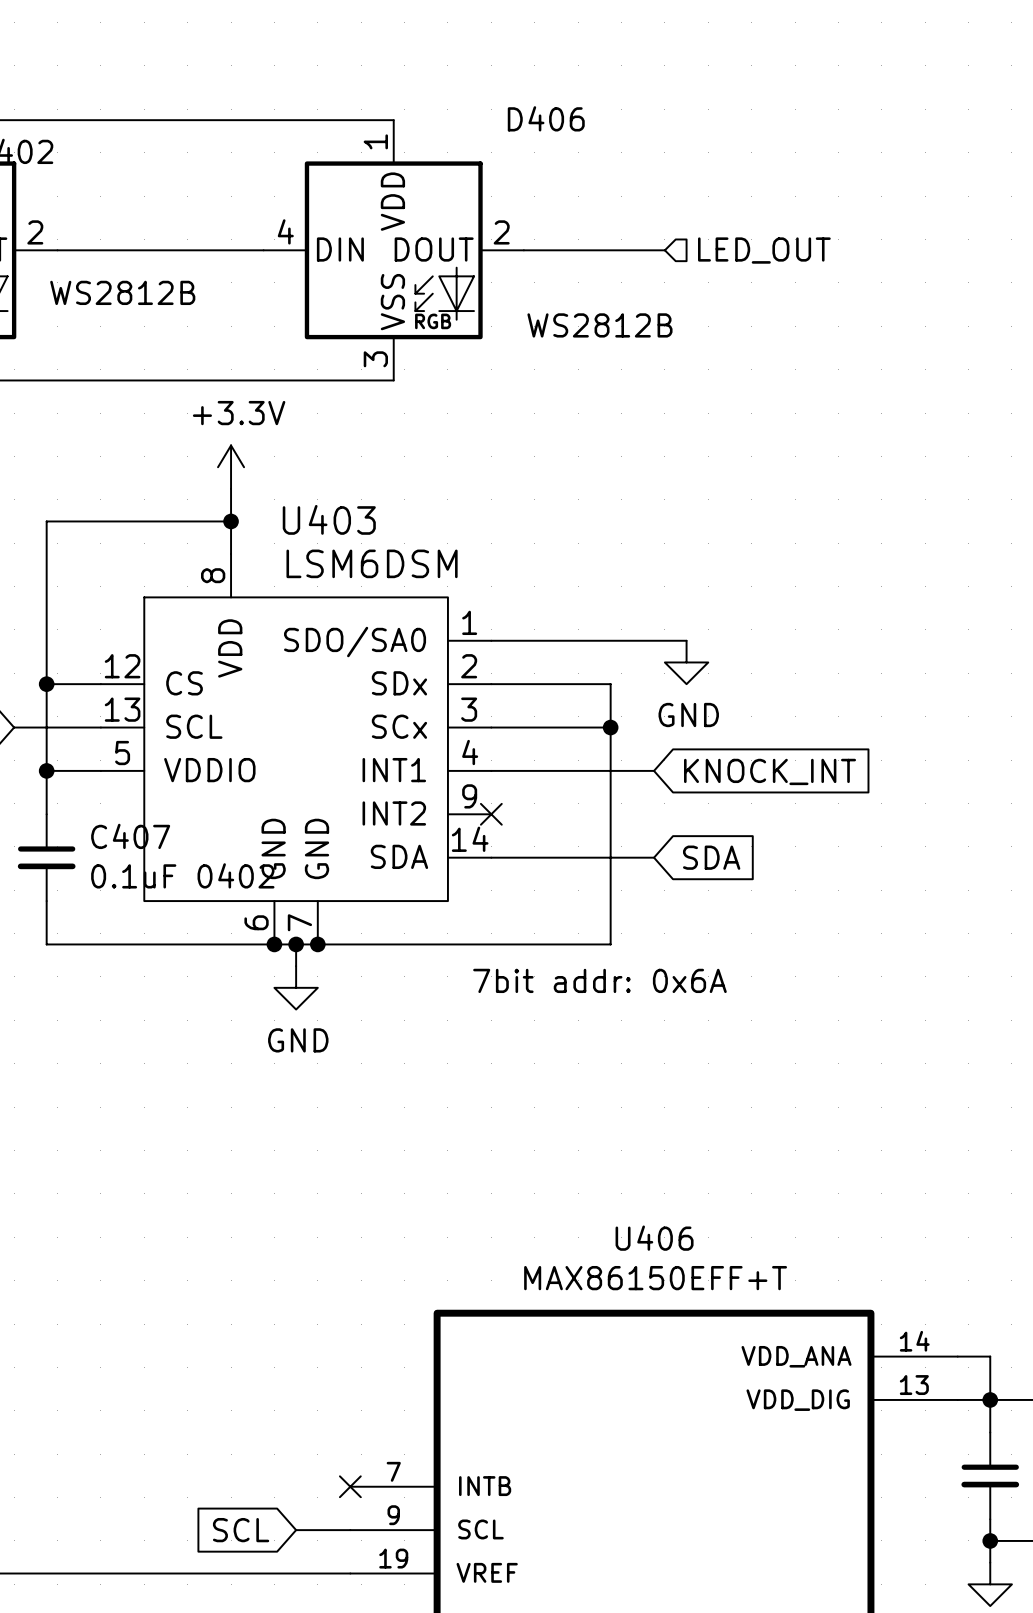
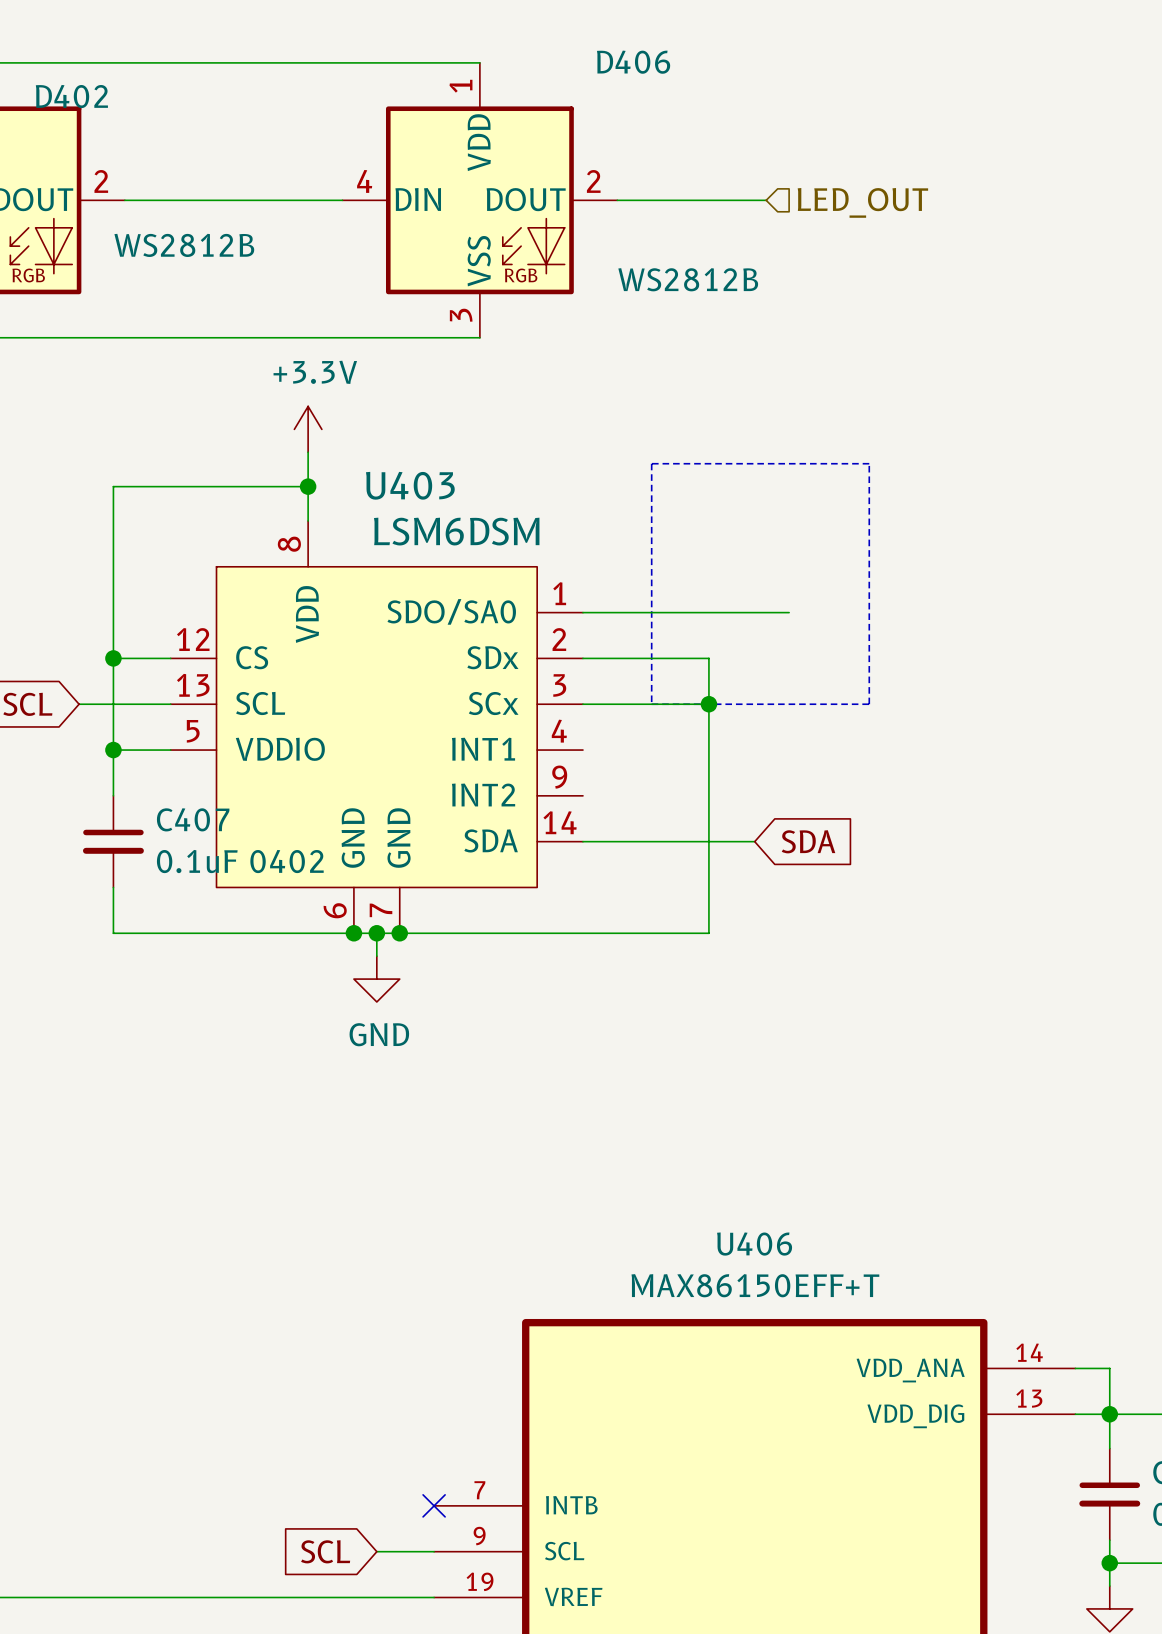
line: none -> (651, 463) (651, 704) (869, 704) (869, 463) (651, 463)
power symbol: GND (686, 662) -> none
wire: (491, 770) (654, 770) -> none
global label: KNOCK_INT (770, 771) -> none
no-connect mark: (491, 814) -> none
text: 7bit addr: 0x6A (599, 980) -> none

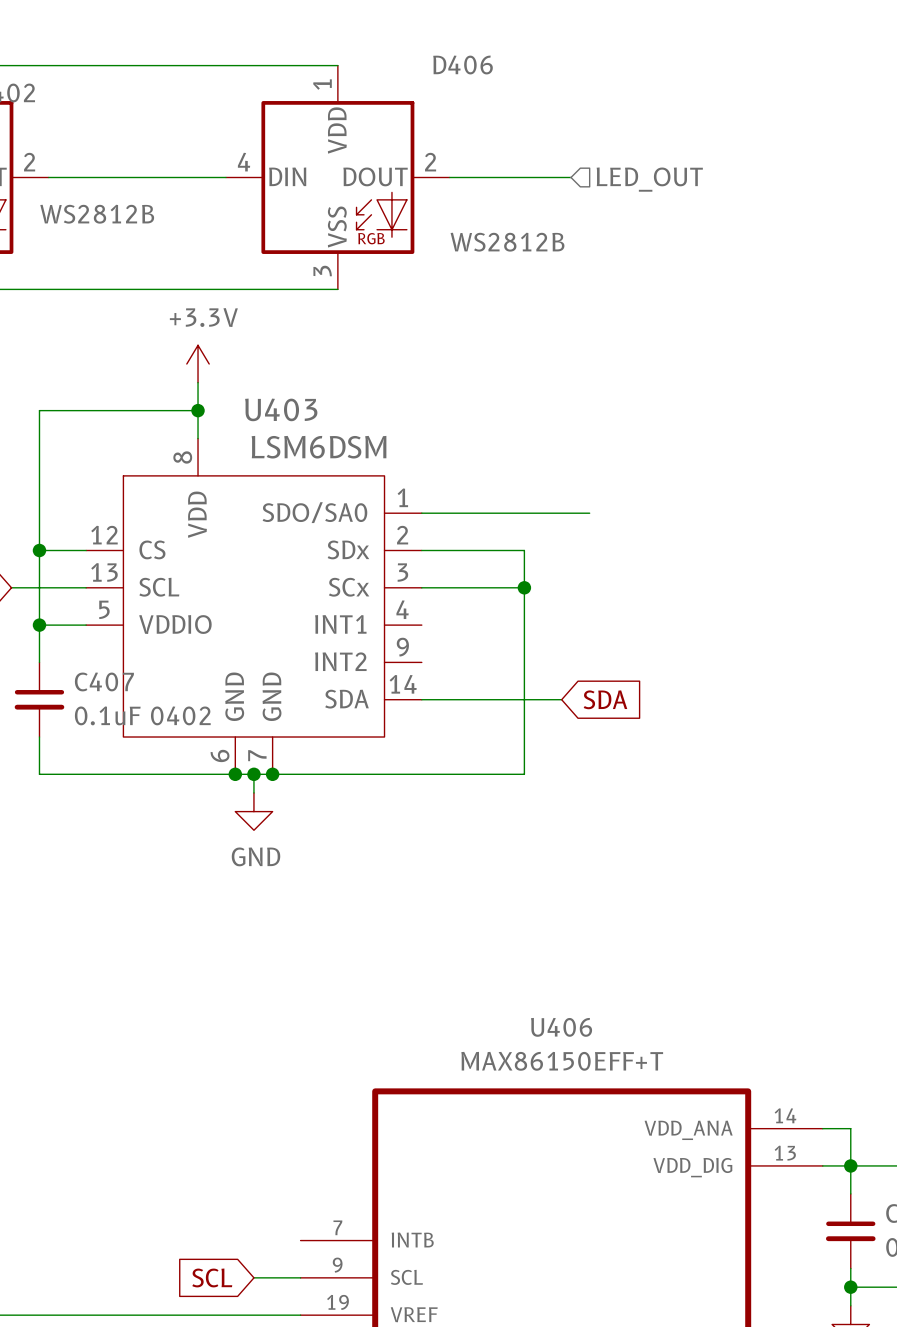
line: (651, 463) (651, 704) (869, 704) (869, 463) (651, 463) -> none
no-connect mark: (434, 1505) -> none

